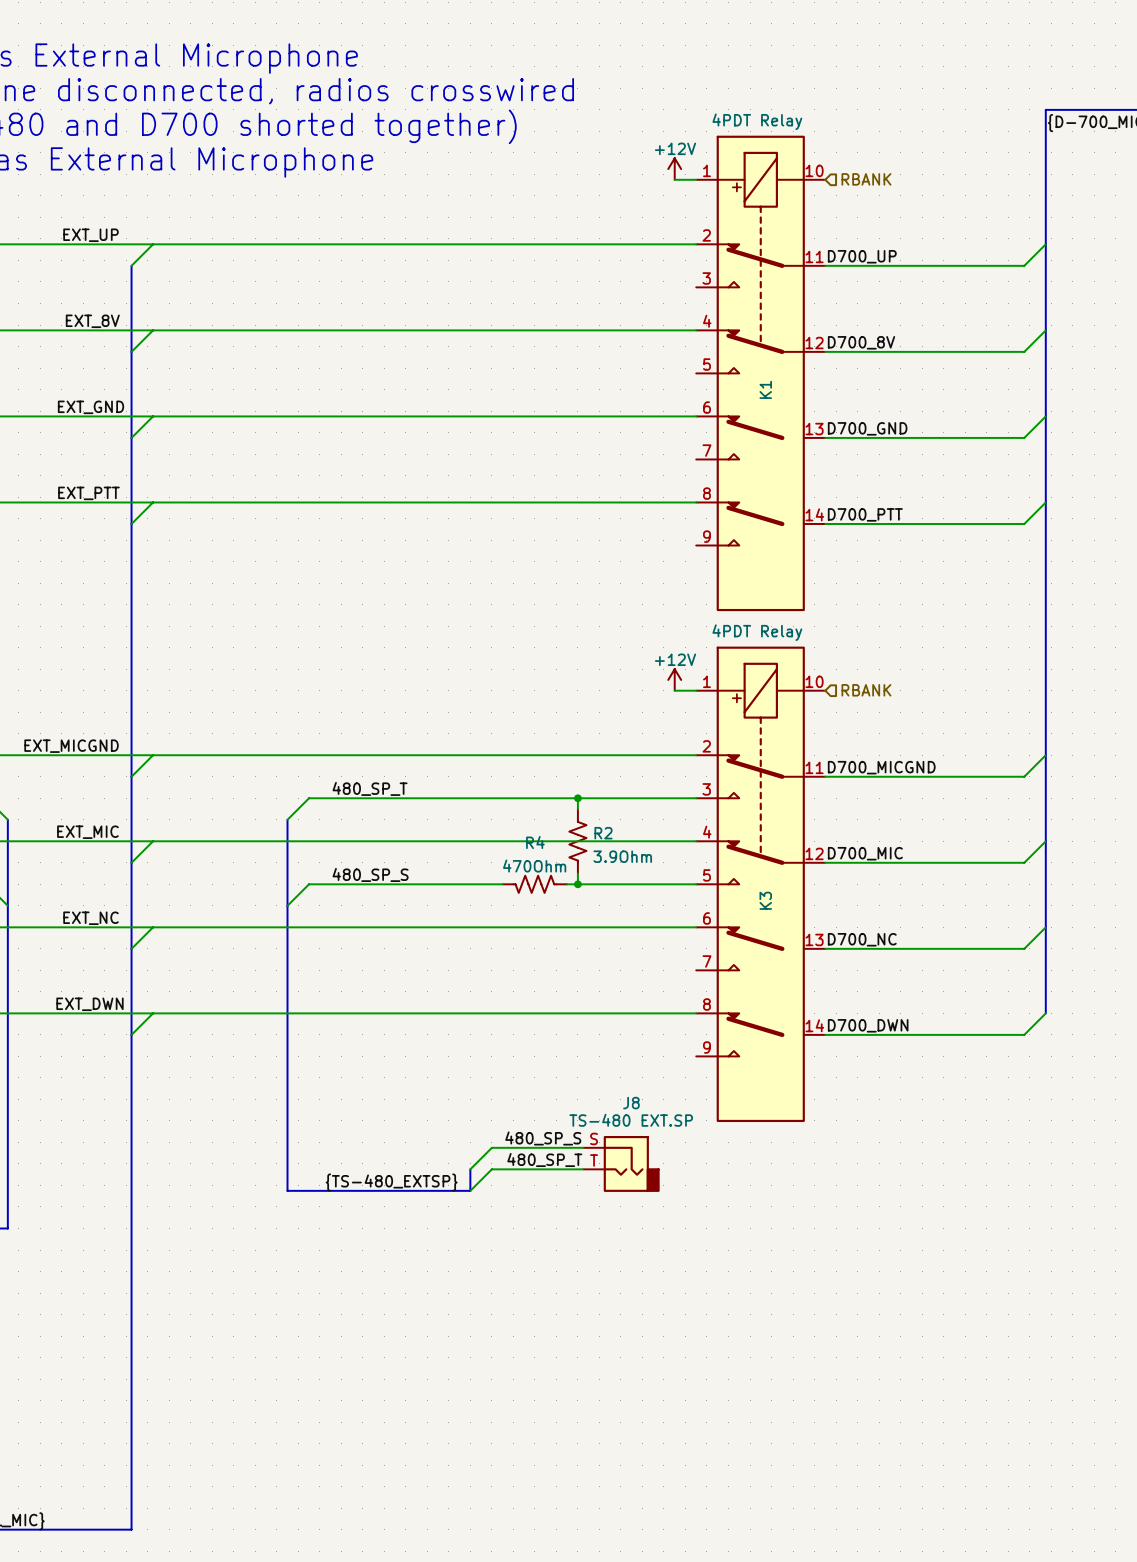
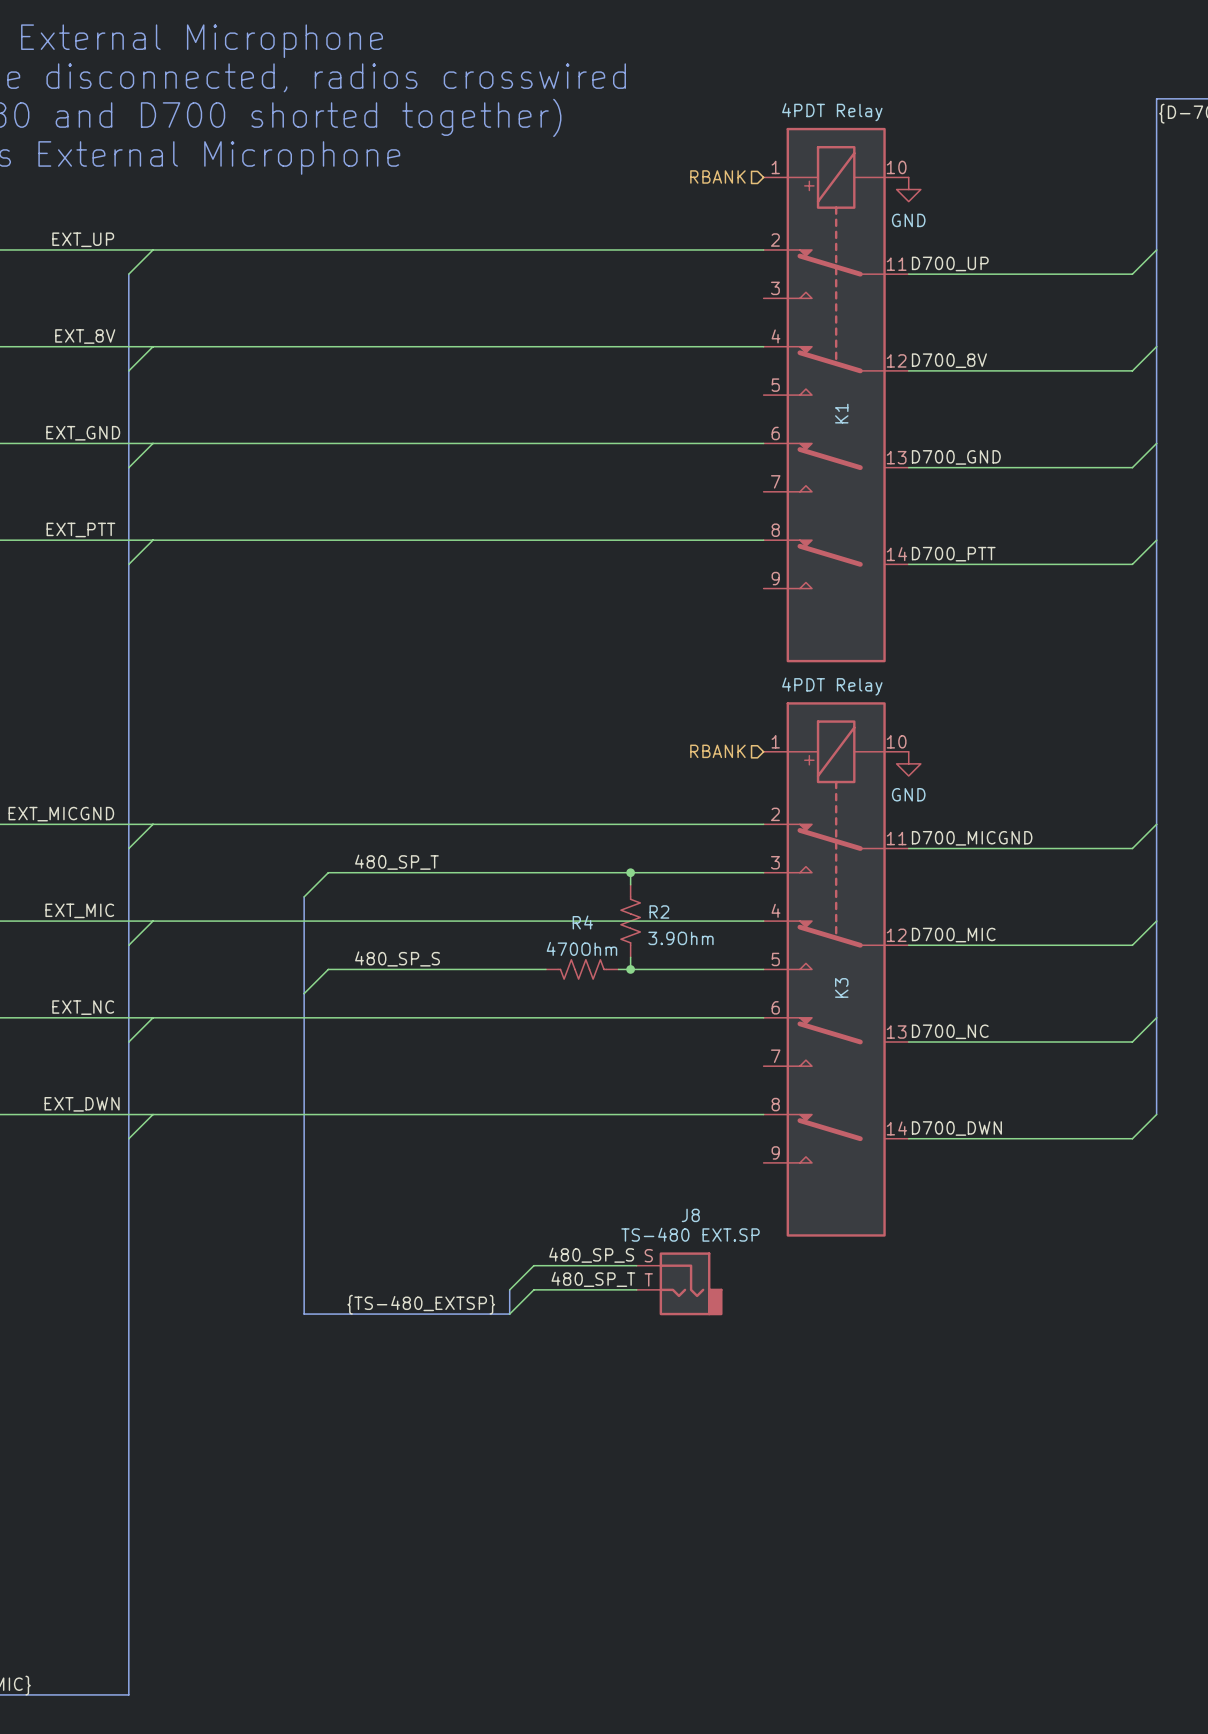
power symbol: +12V (674, 169) -> none
wire: (674, 179) (696, 179) -> none
hierarchical label rotation: 0° (866, 179) -> 180° (717, 176)
hierarchical label position: RBANK (866, 179) -> RBANK (717, 176)
power symbol: none -> GND (908, 189)
power symbol: +12V (674, 679) -> none
wire: (674, 690) (696, 690) -> none
hierarchical label rotation: 0° (866, 690) -> 180° (717, 751)
hierarchical label position: RBANK (866, 690) -> RBANK (717, 751)
power symbol: none -> GND (908, 763)

